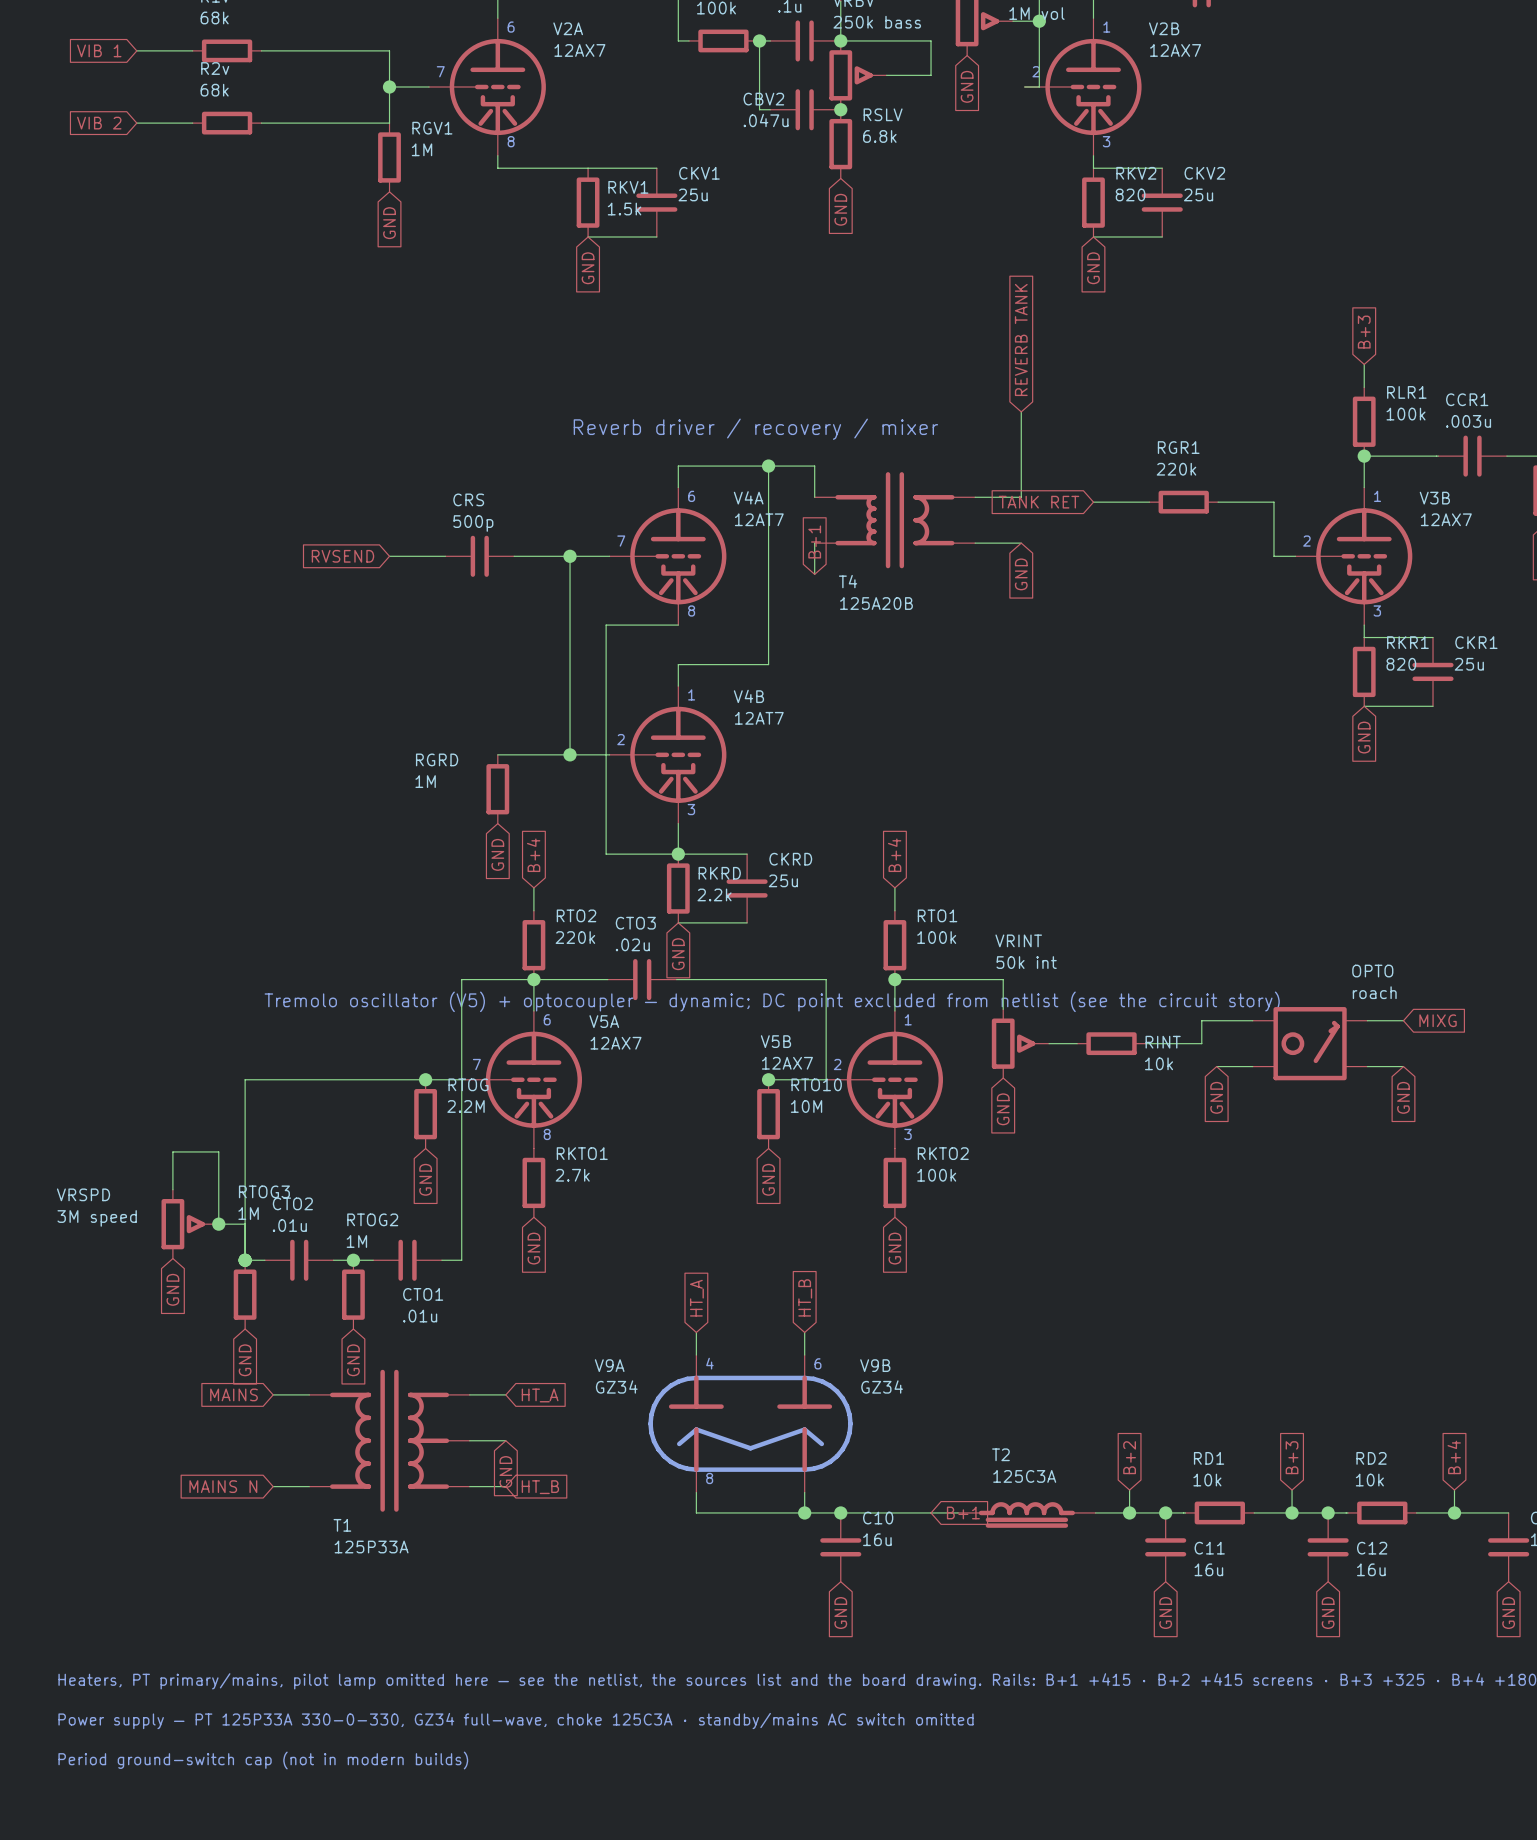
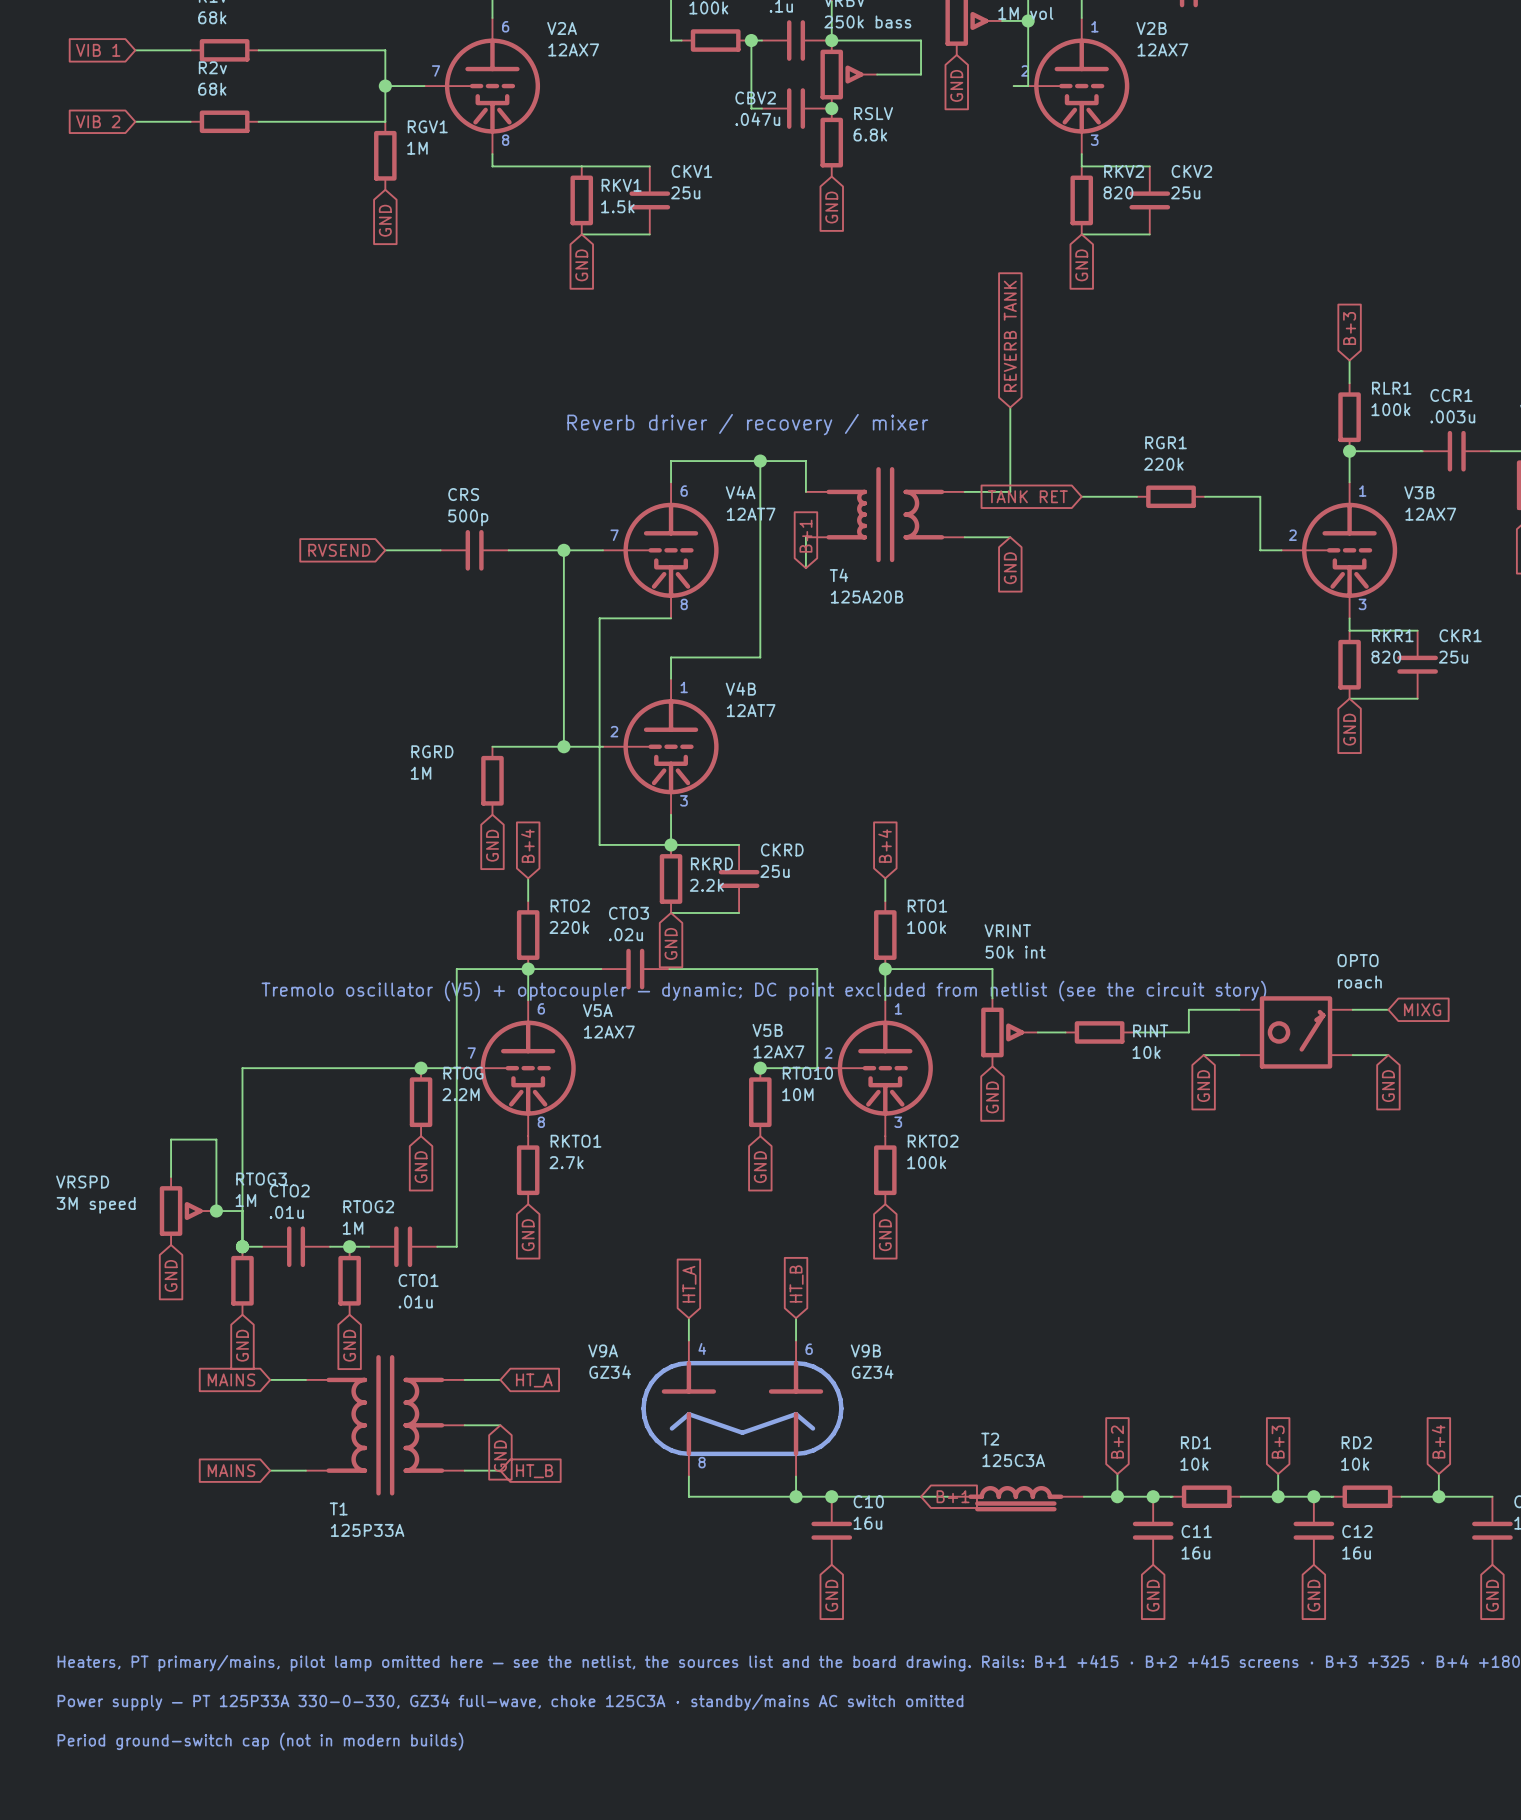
global label: MAINS N (223, 1486) -> MAINS (231, 1470)

